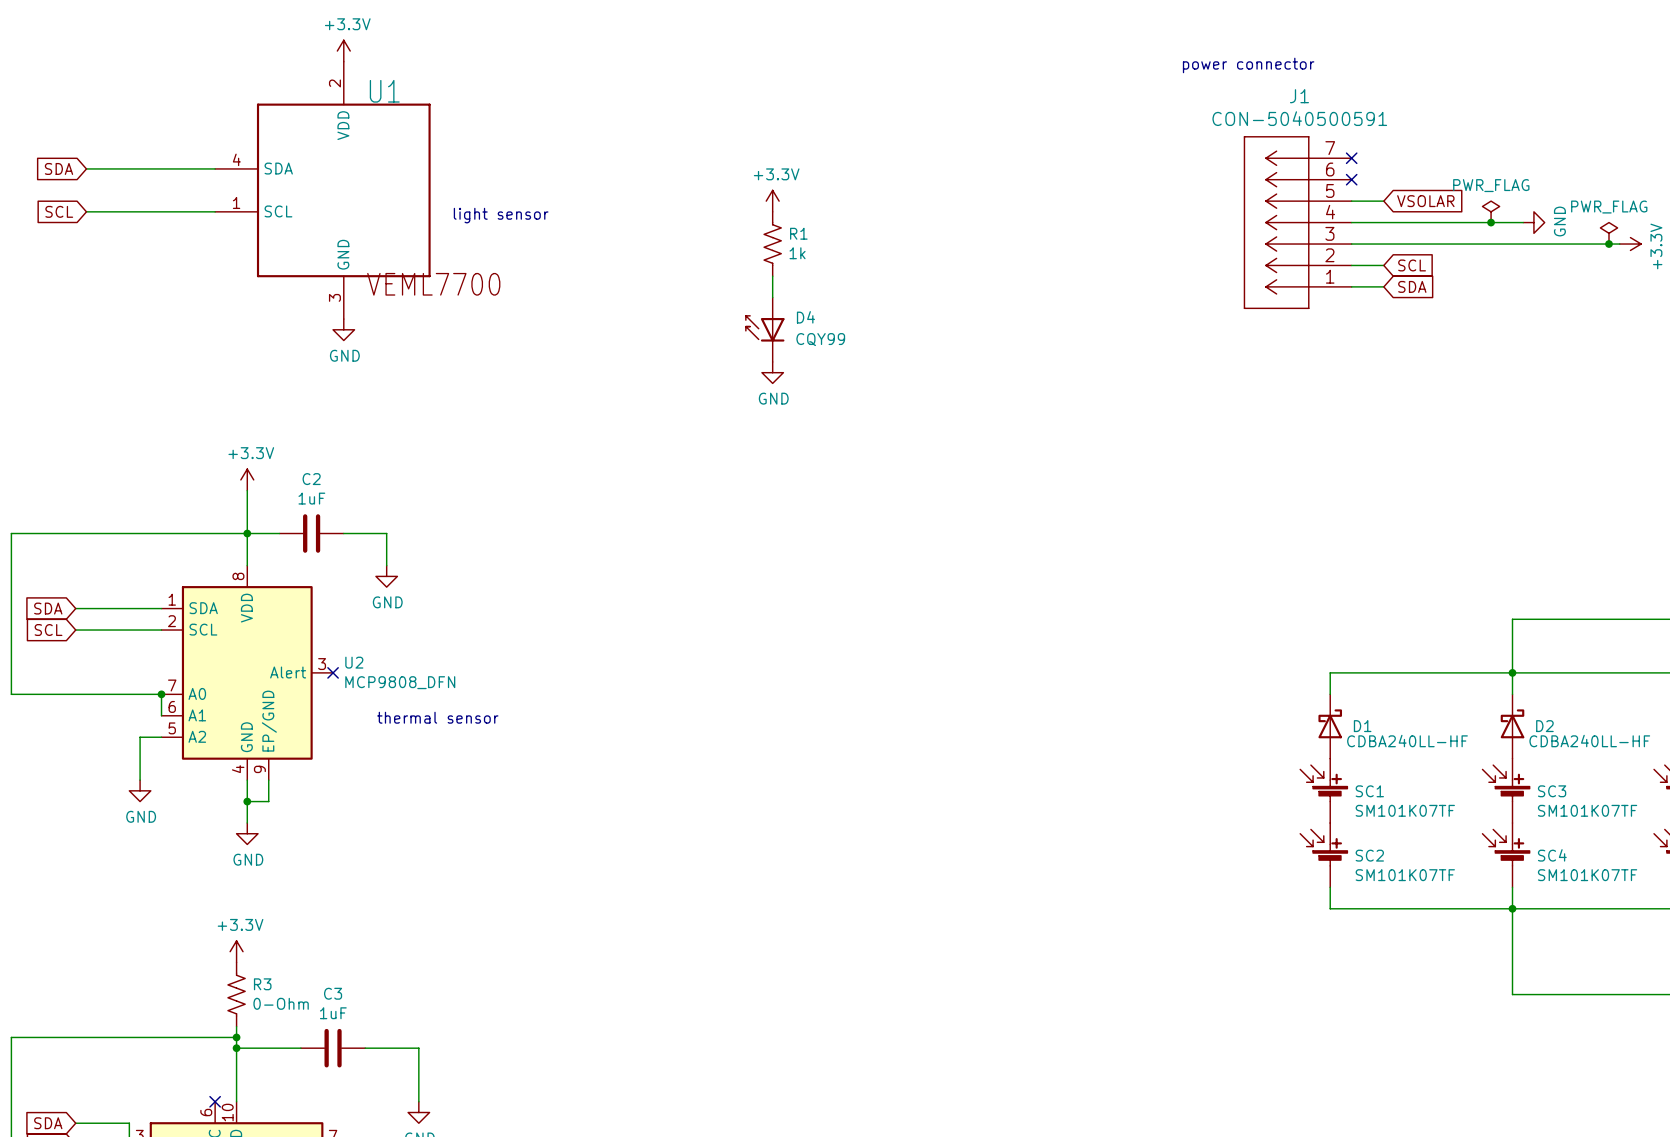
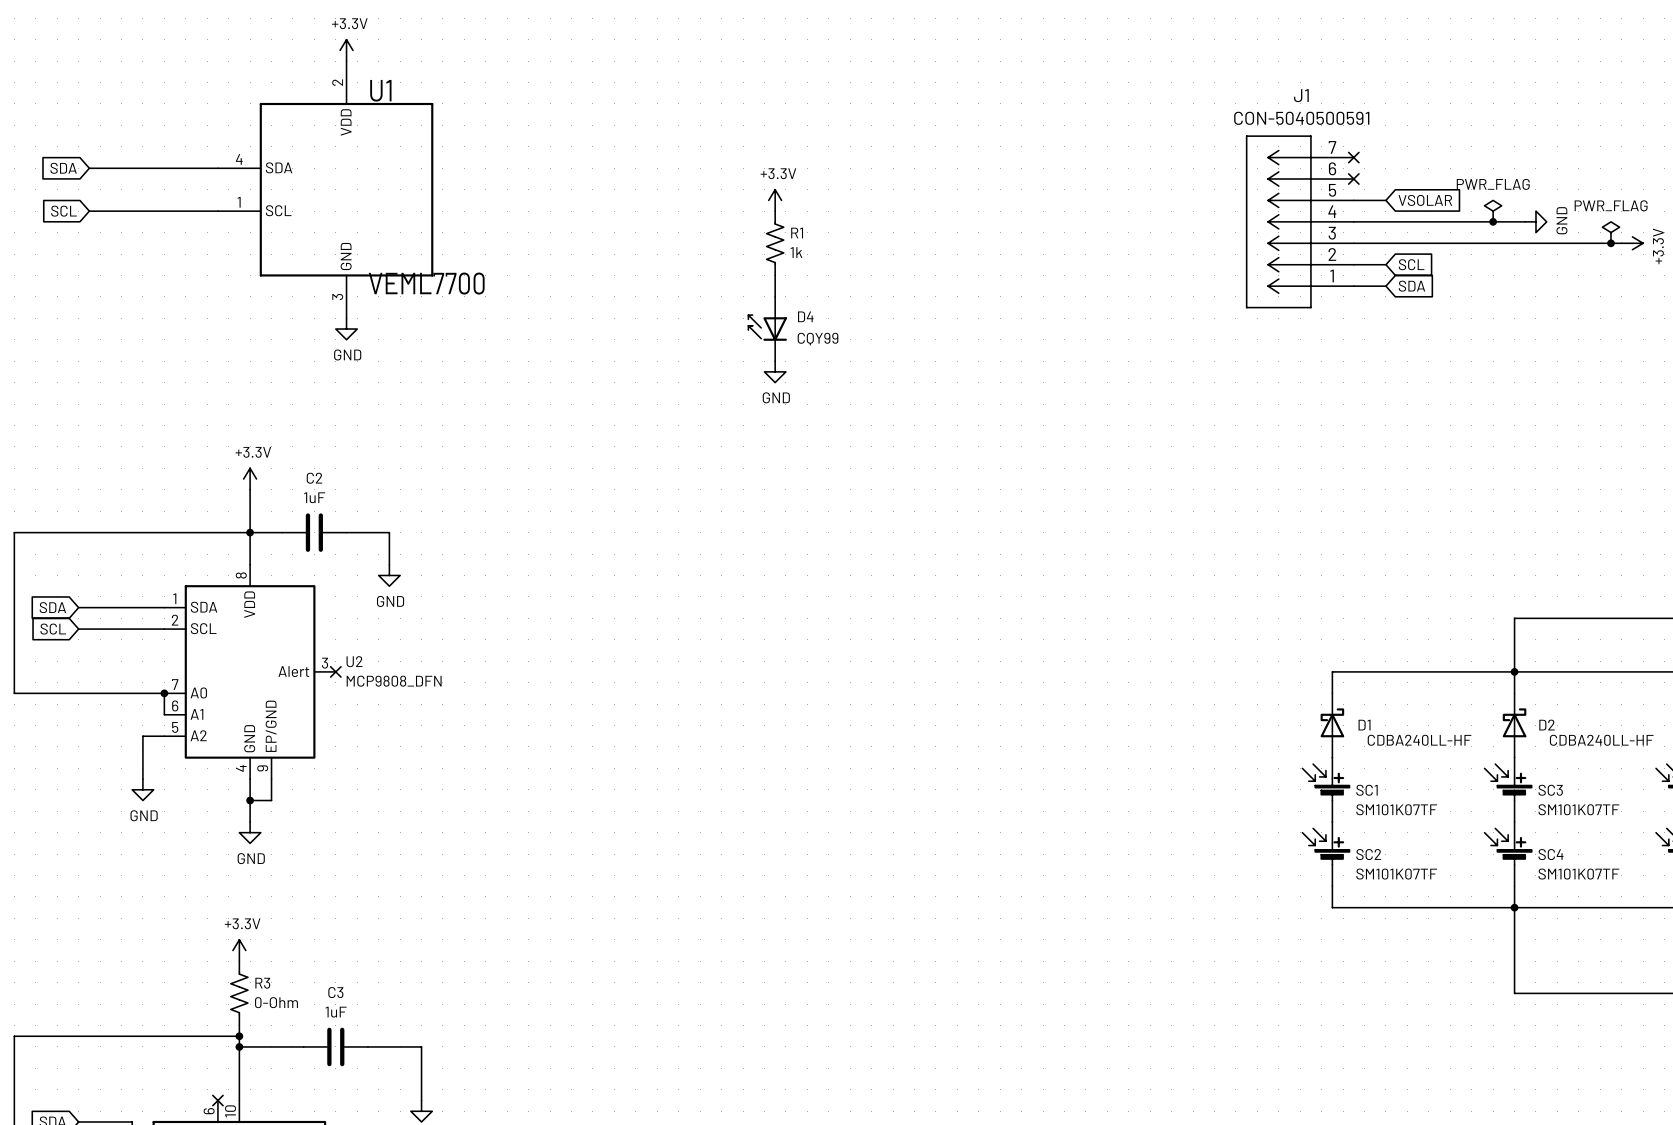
text: power connector (1248, 65) -> none
text: light sensor (501, 215) -> none
text: thermal sensor (437, 717) -> none

